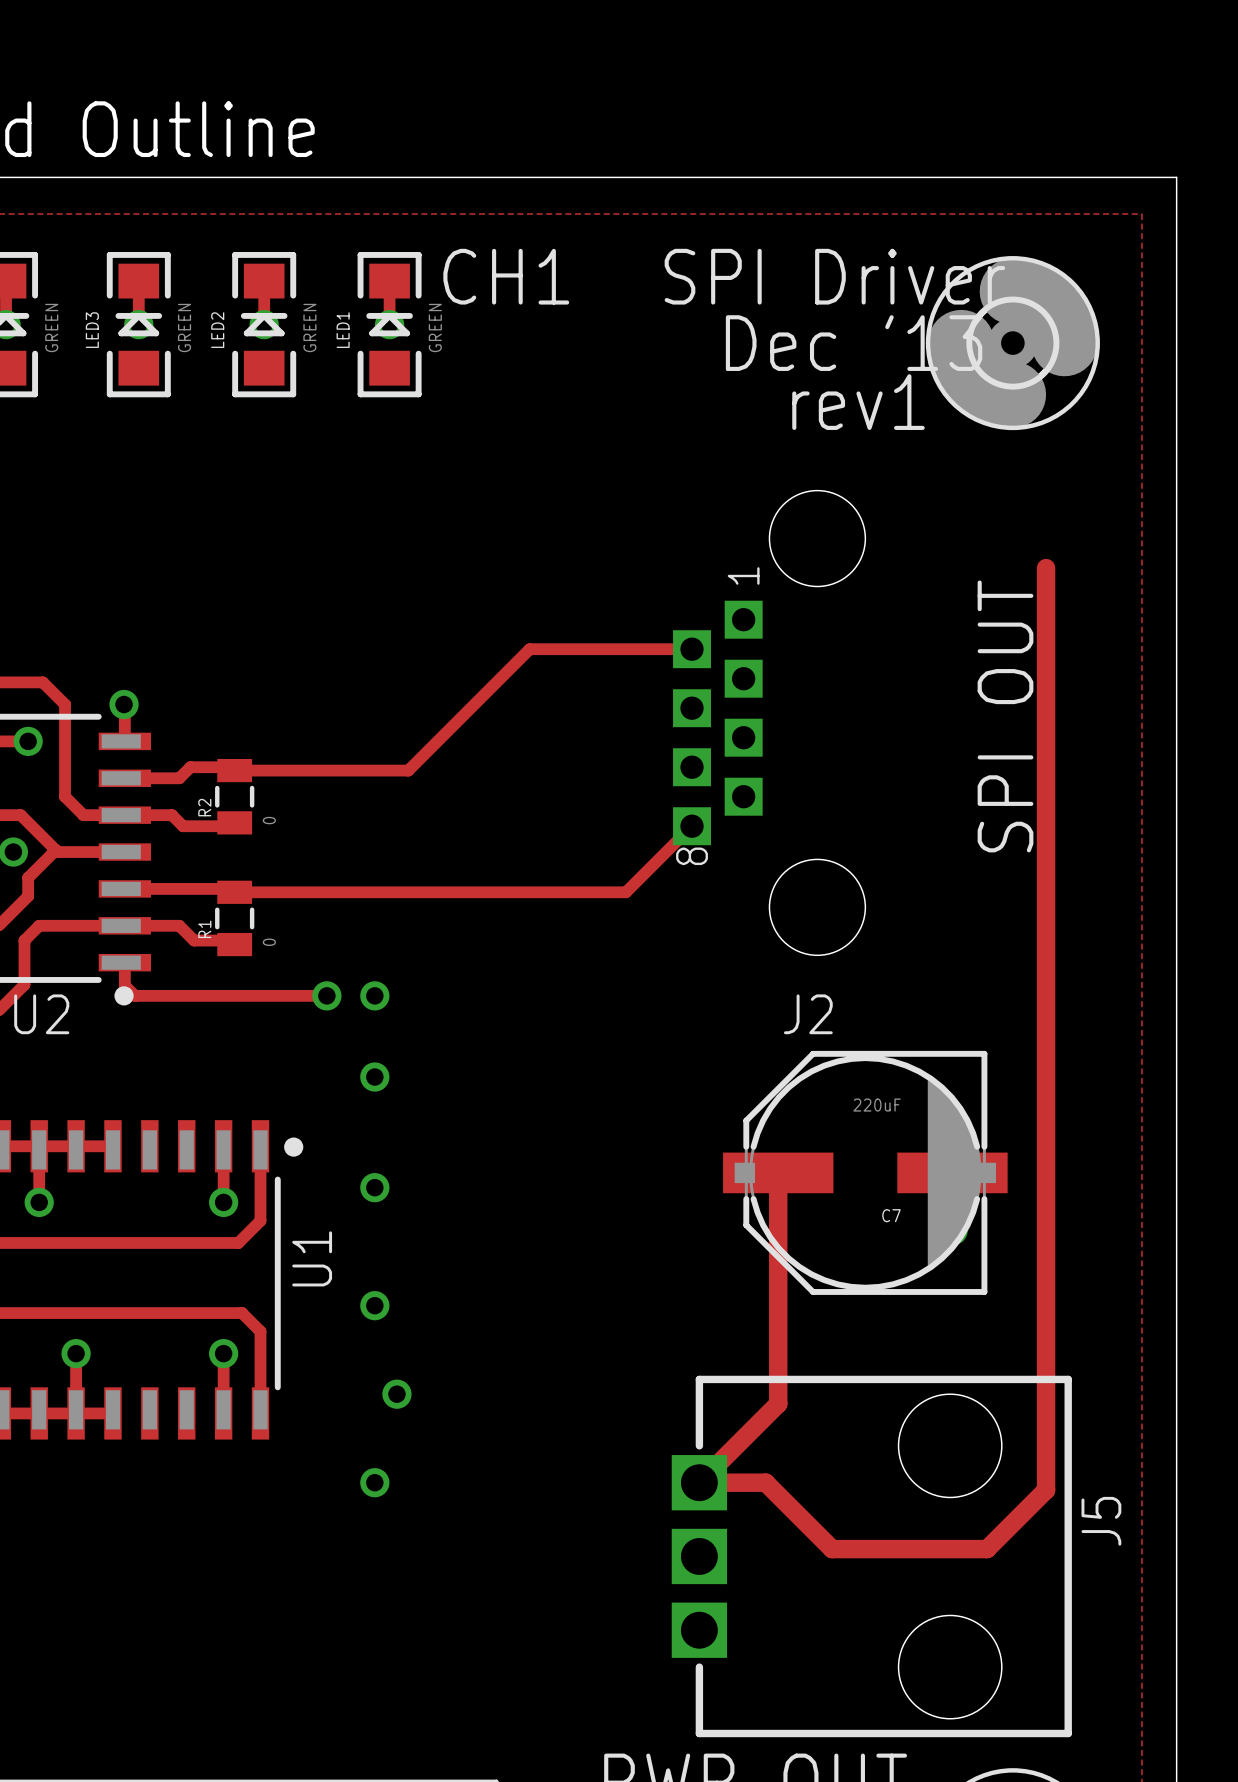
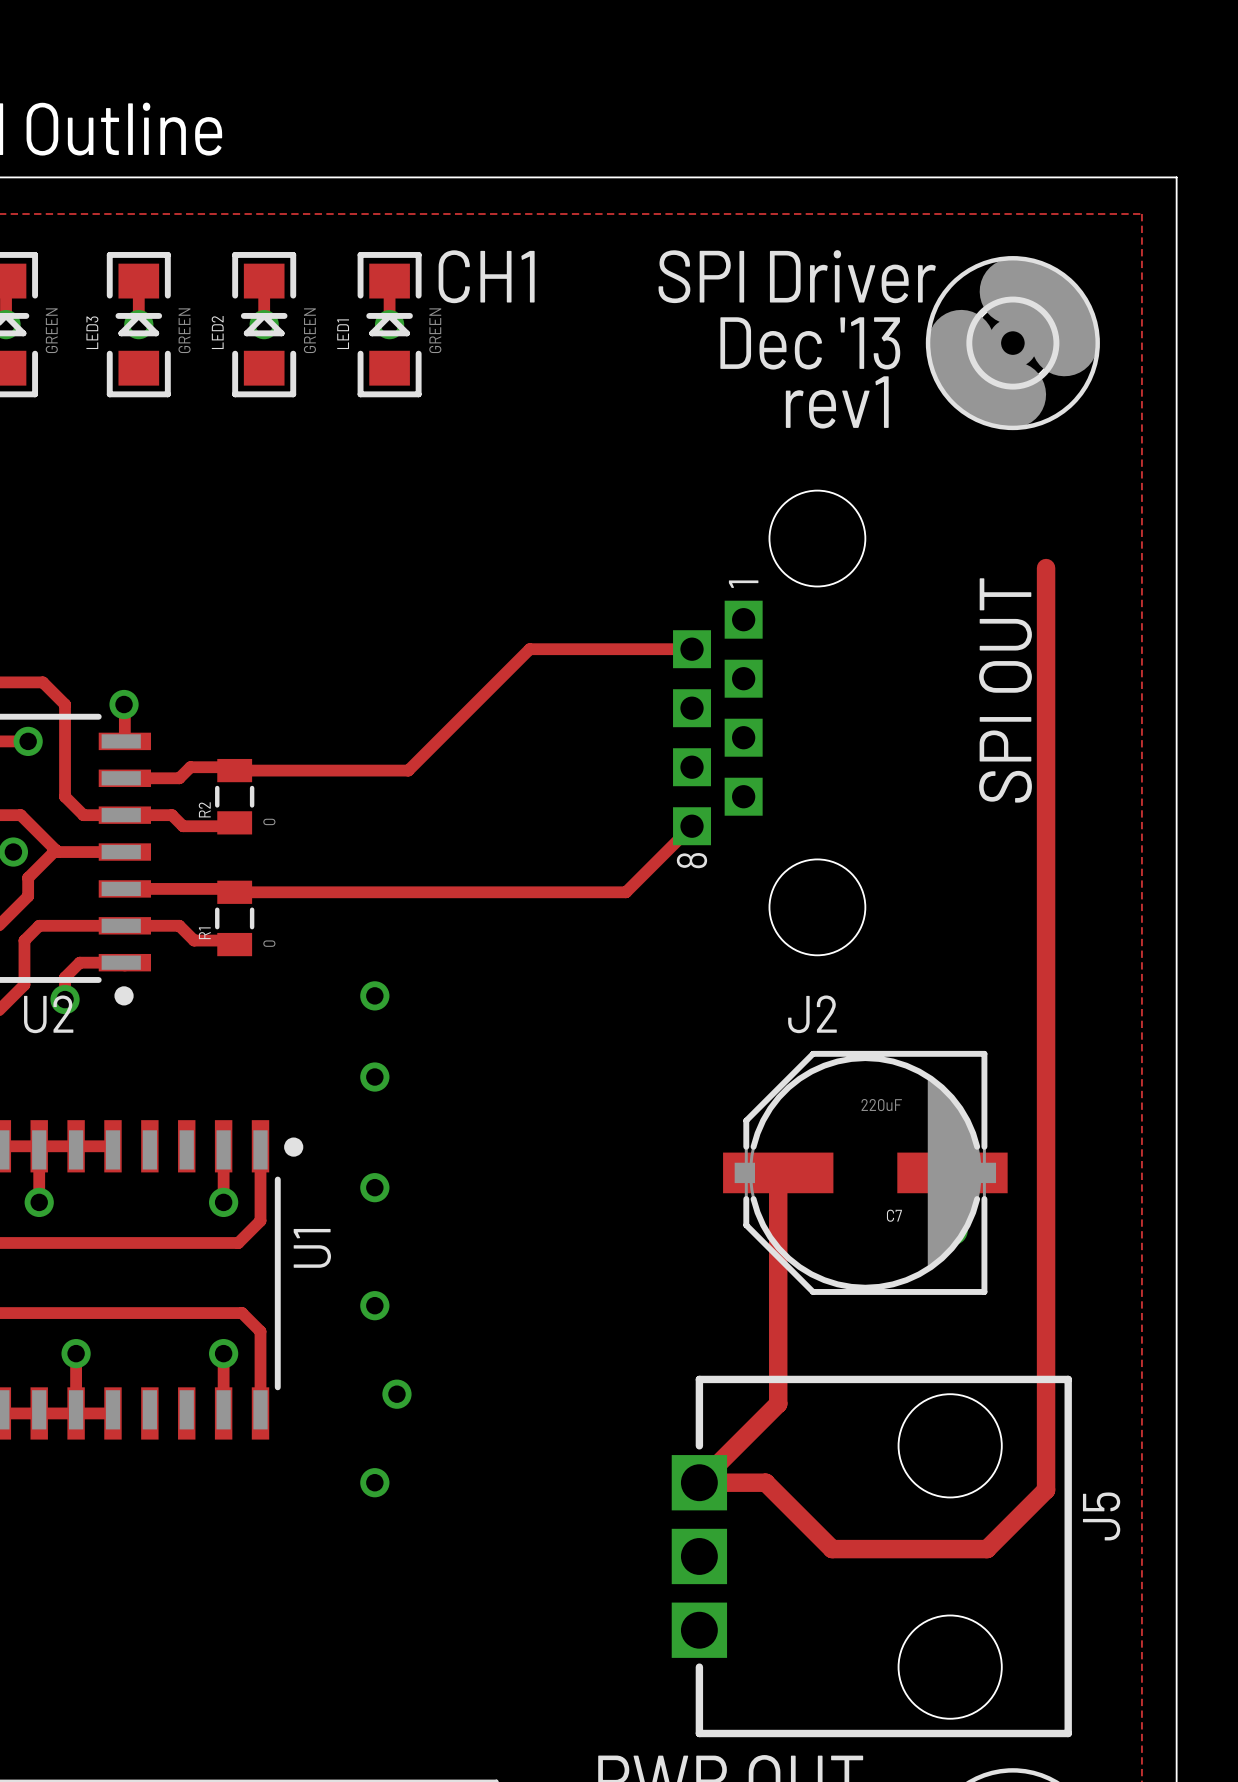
track: none -> (124, 962) (79, 962) (65, 977) (65, 999)
track: (124, 965) (124, 985) (135, 995) (326, 995) -> none
via: (326, 995) -> none
via: none -> (65, 999)

